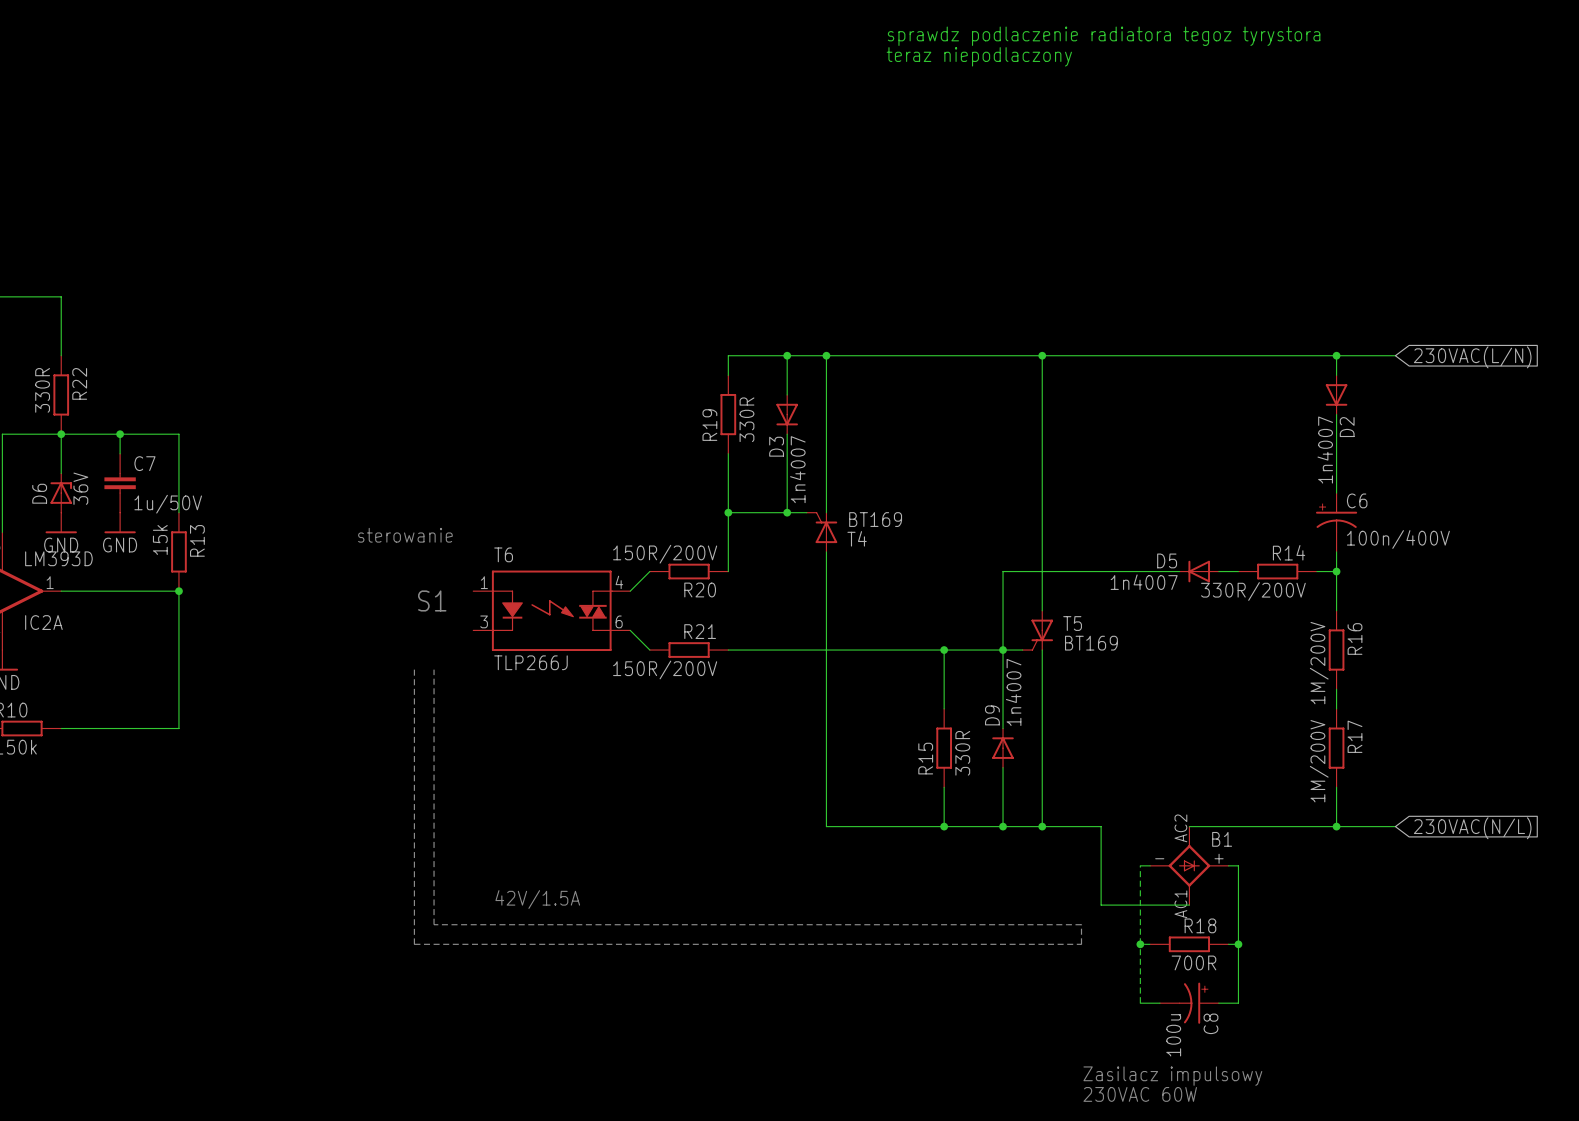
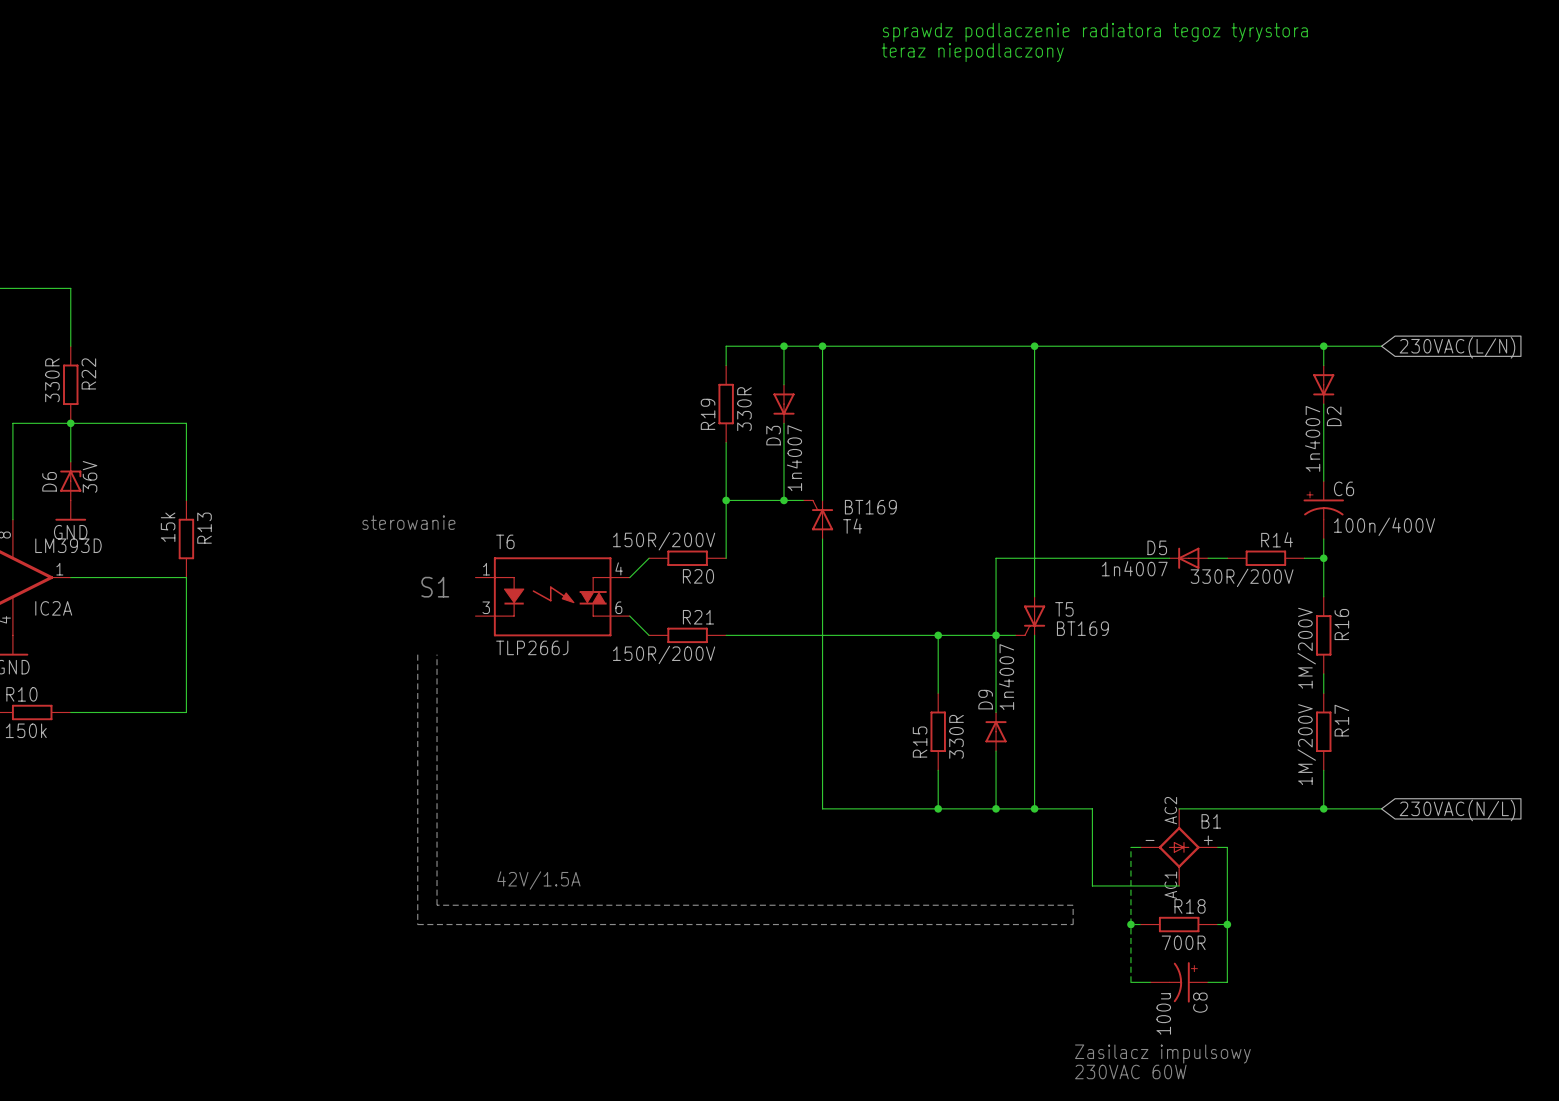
wire: (120, 434) (120, 453) -> none
junction: (120, 434) -> none
C7: 1u/50V (120, 483) -> none
power symbol: GND (120, 522) -> none
junction: (178, 591) -> none

